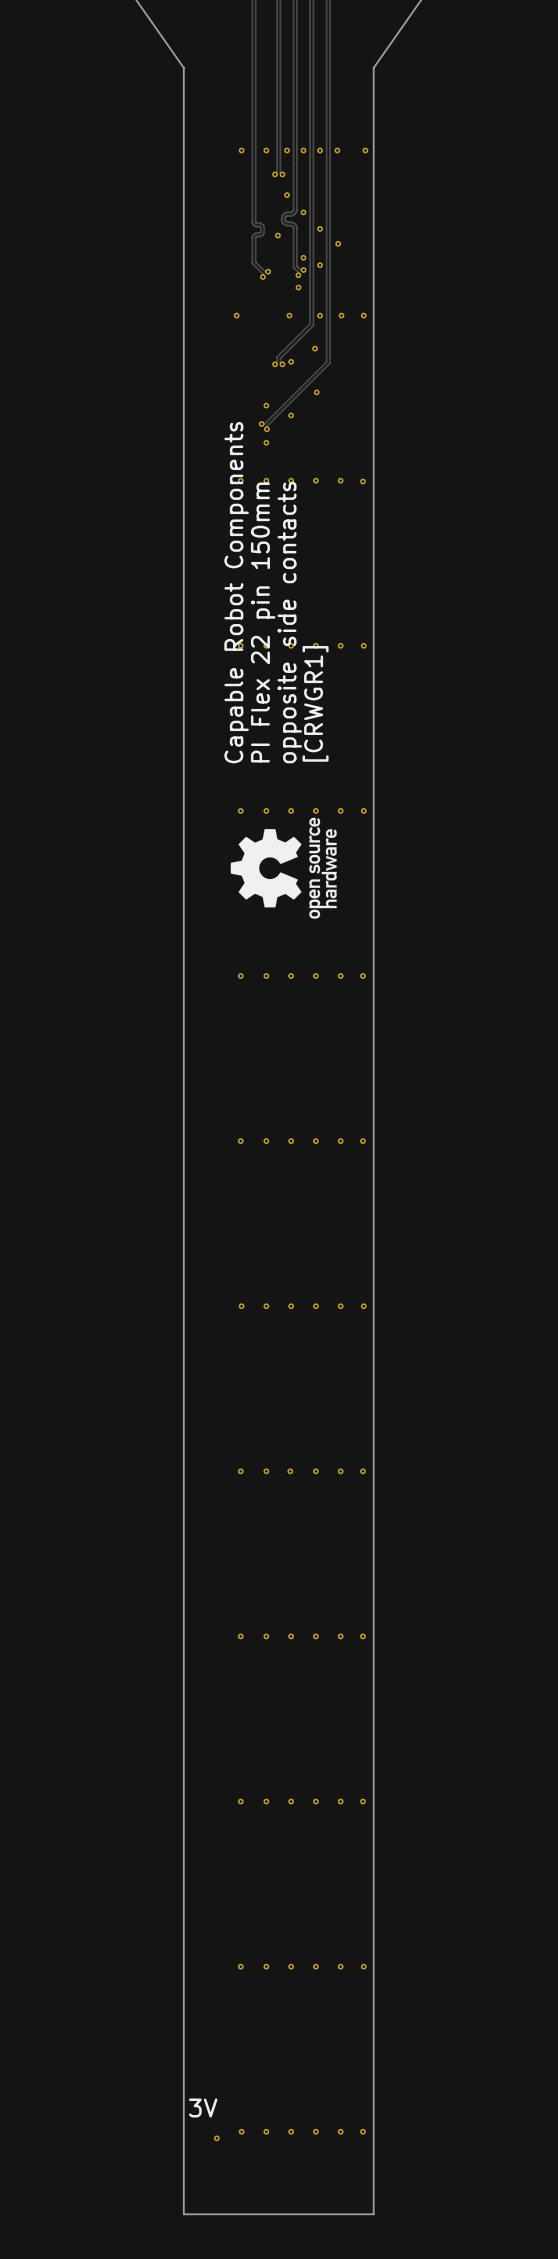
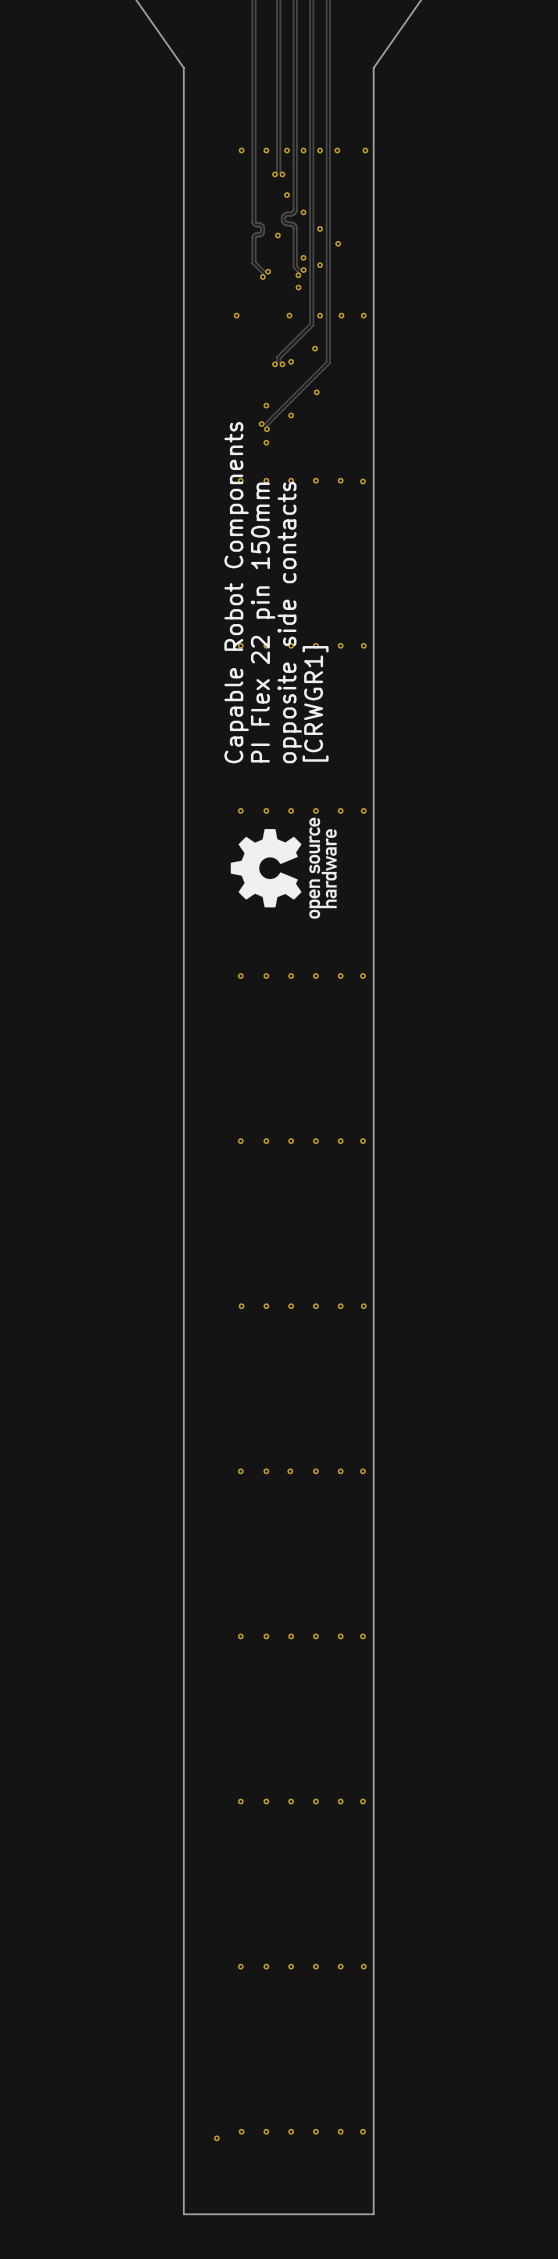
text: 3V (203, 2108) -> none

